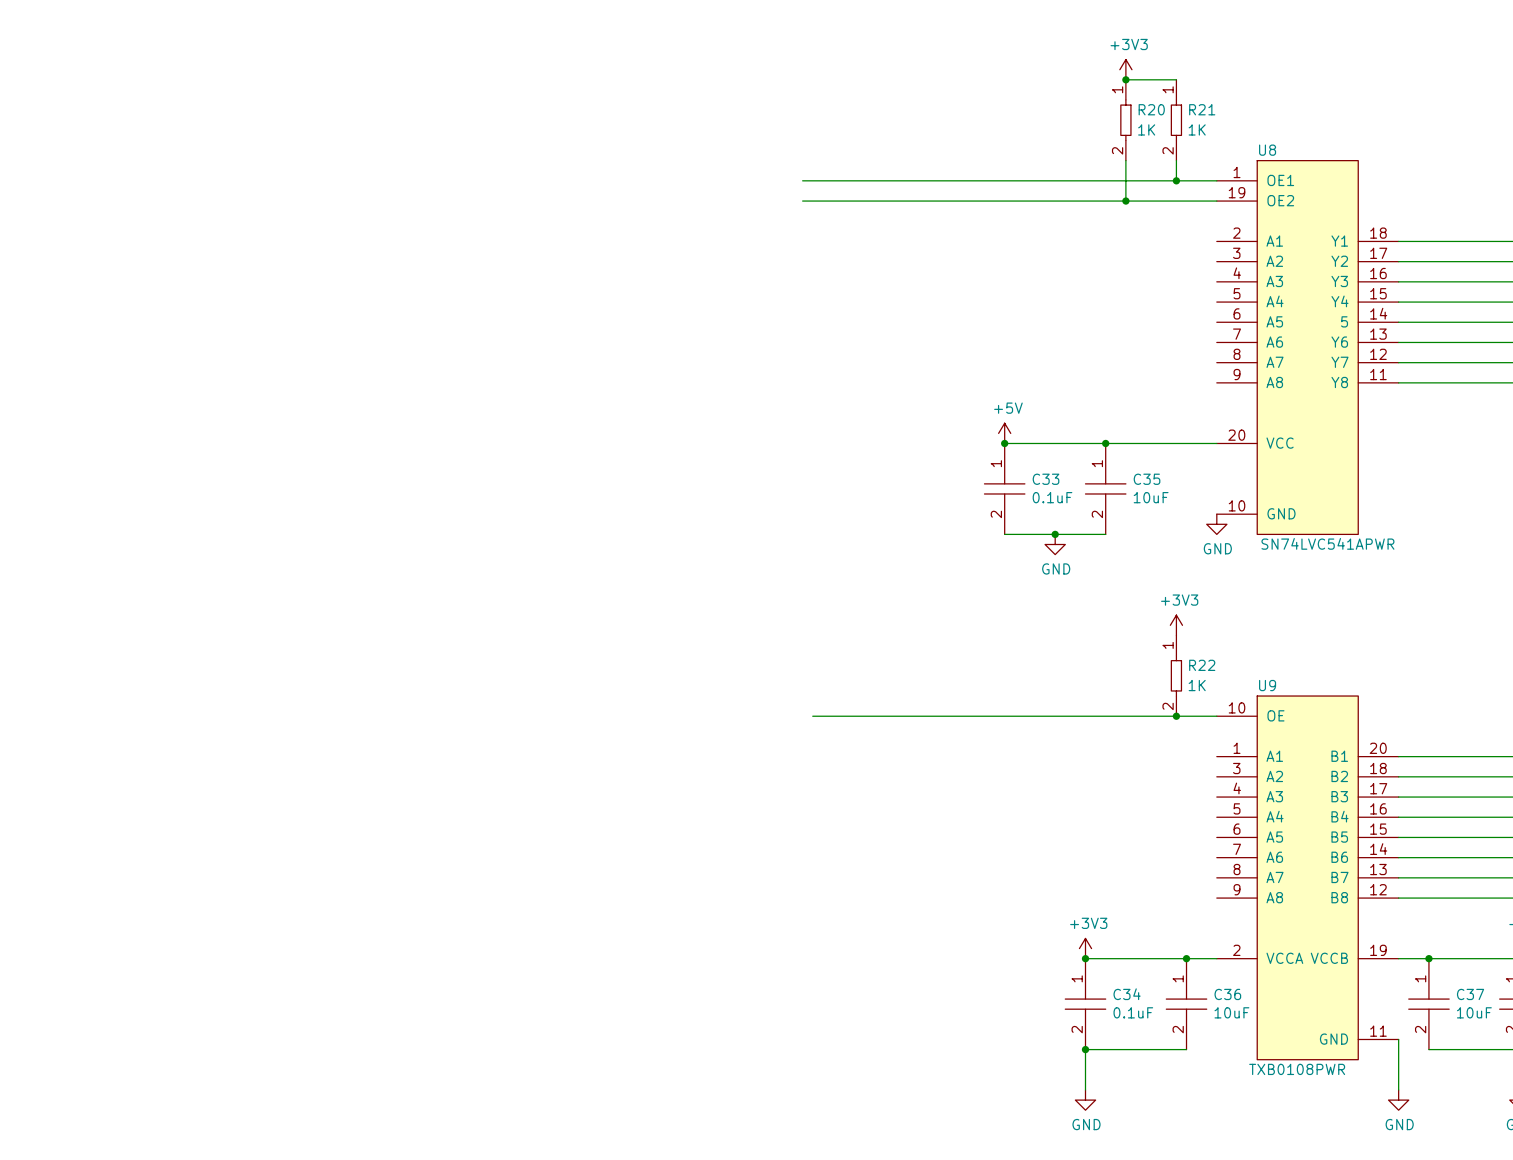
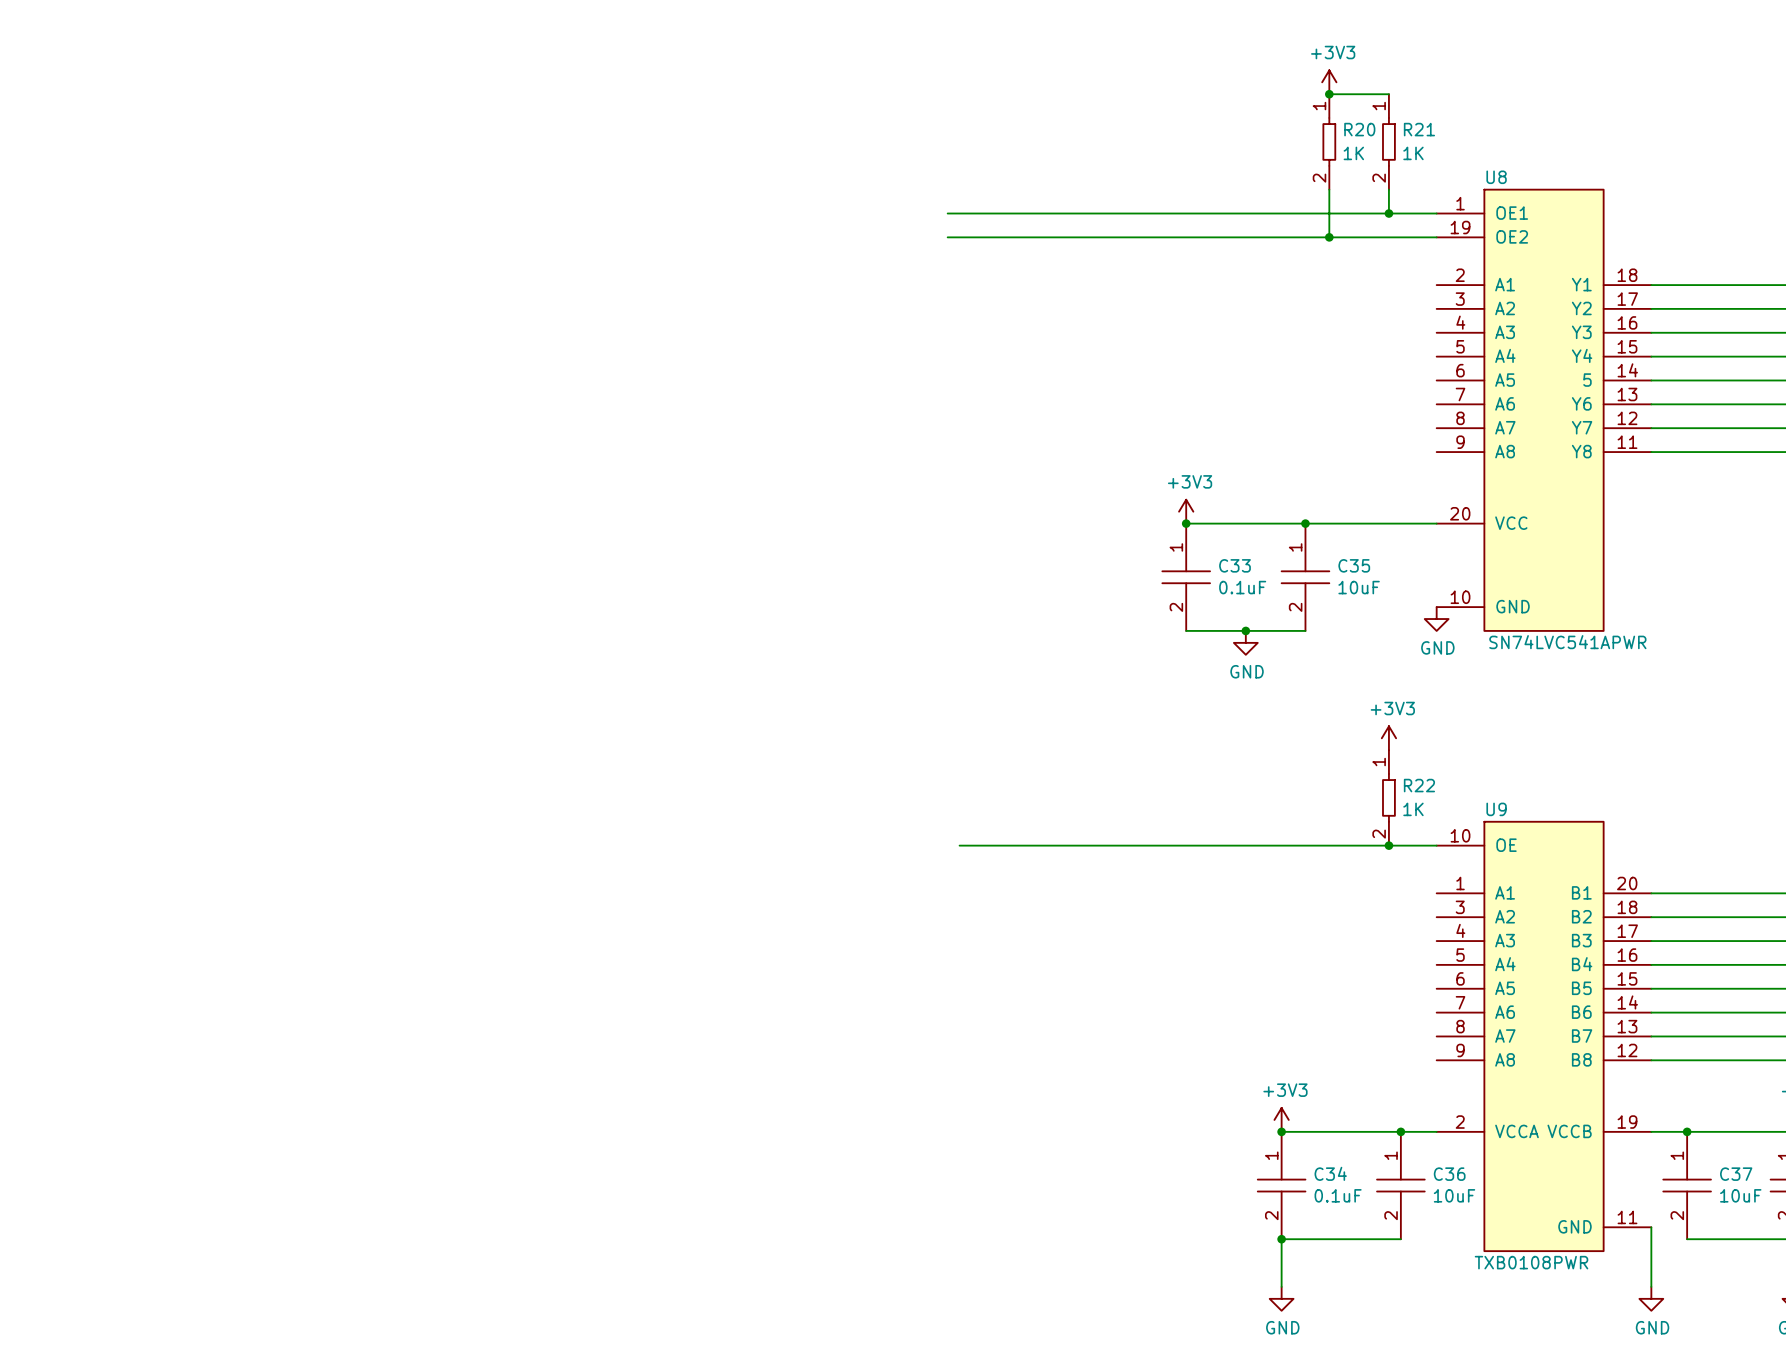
power symbol: +5V (1004, 433) -> +3V3 (1186, 511)

